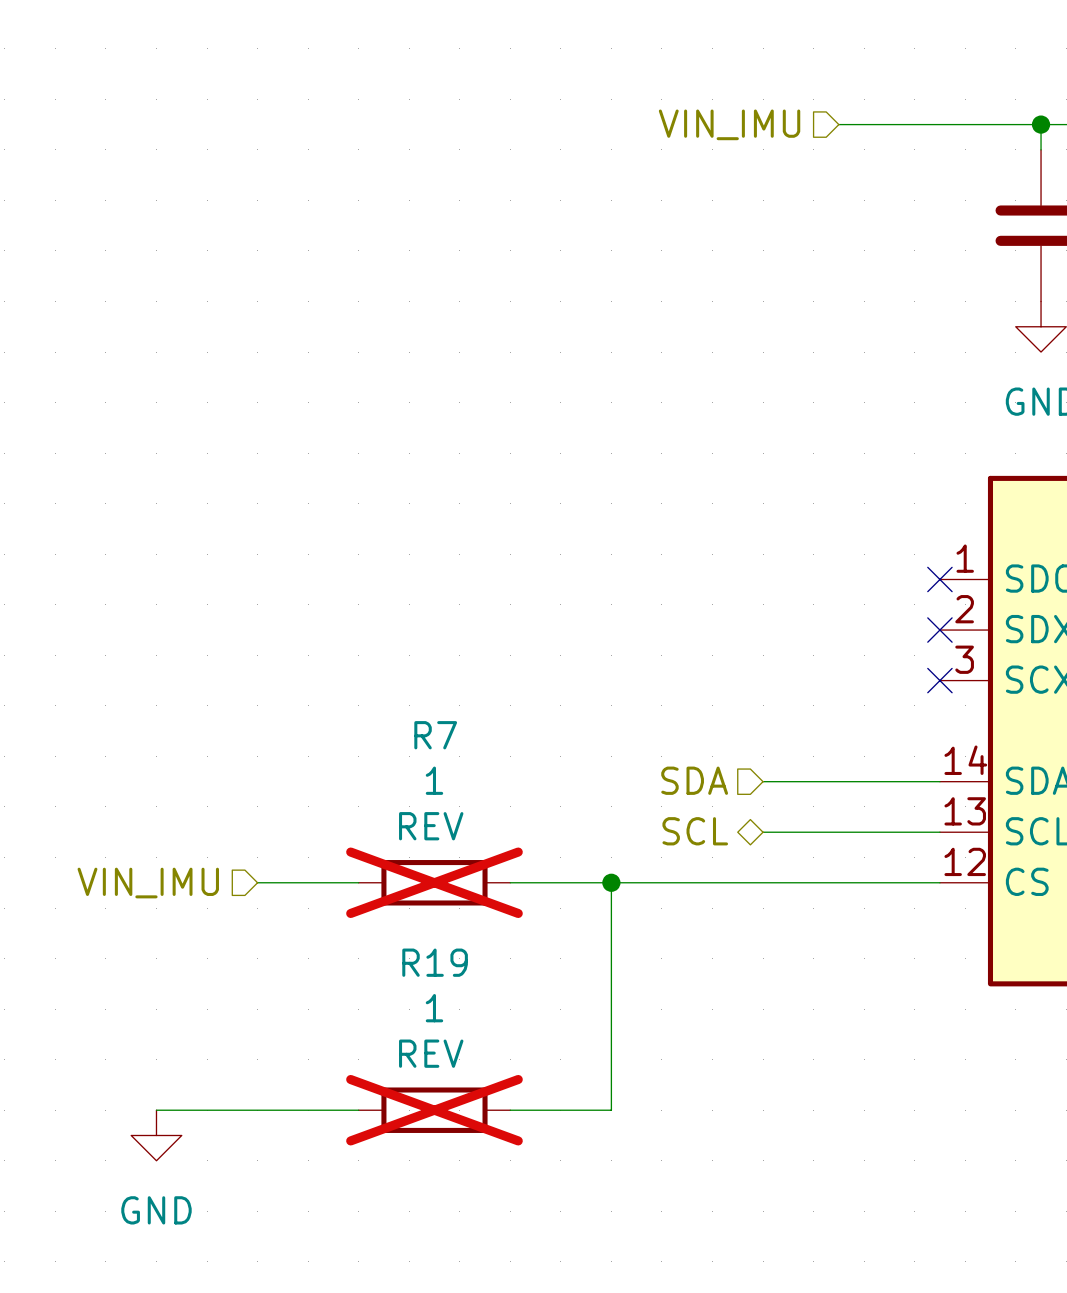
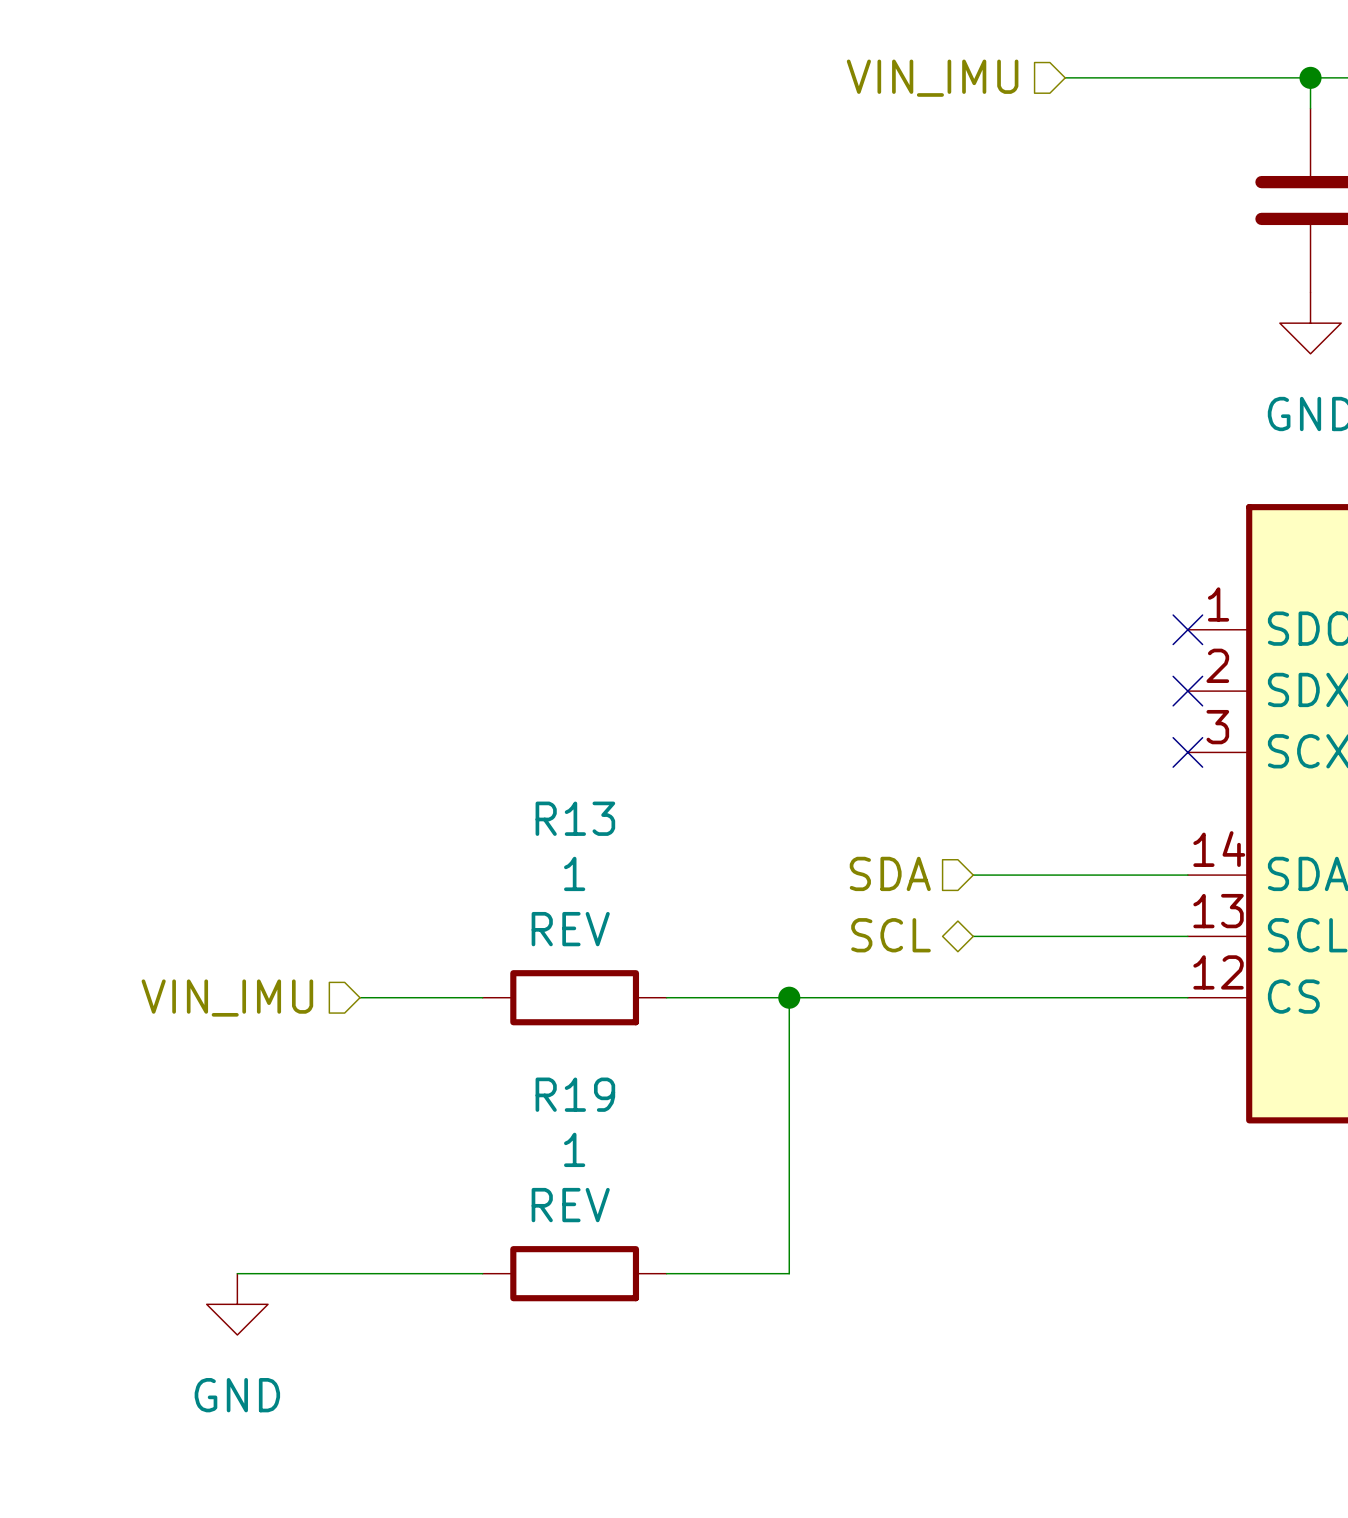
R7 name: R7 (435, 735) -> R13 (575, 818)
R7 do-not-place cross: (434, 882) -> none
R19 do-not-place cross: (434, 1110) -> none

